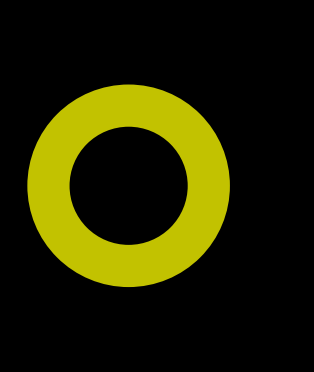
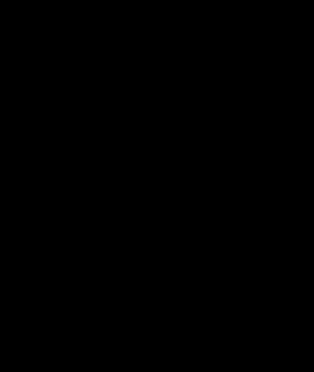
part: (128, 185) -> none

